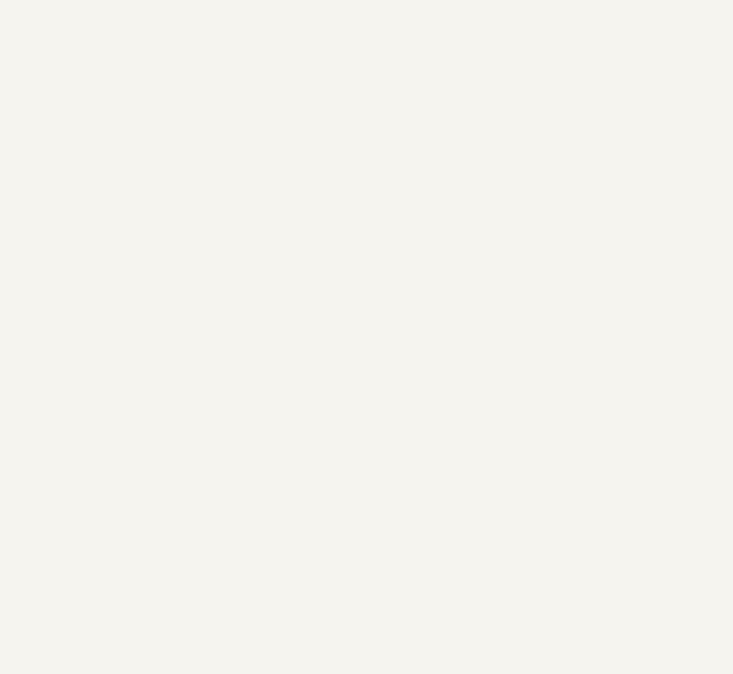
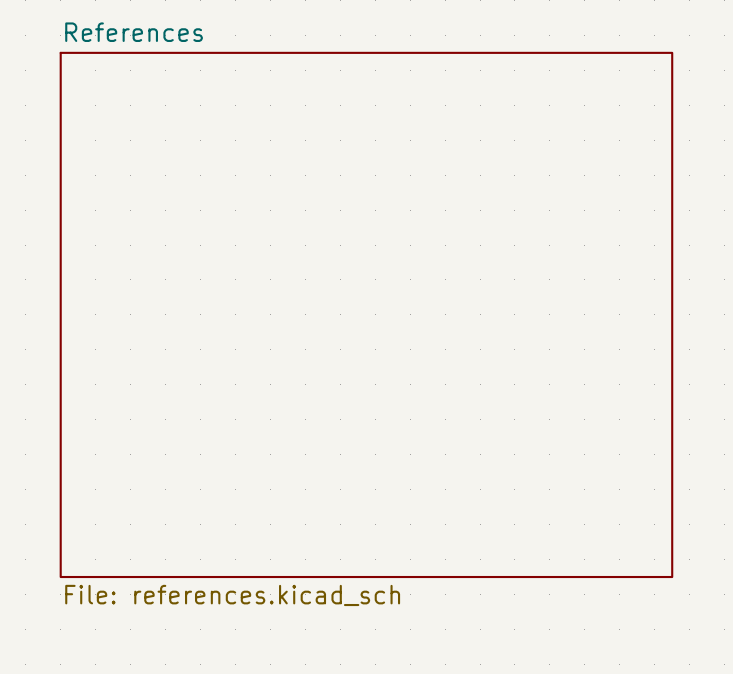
sheet References: none -> File: references.kicad_sch (366, 314)

